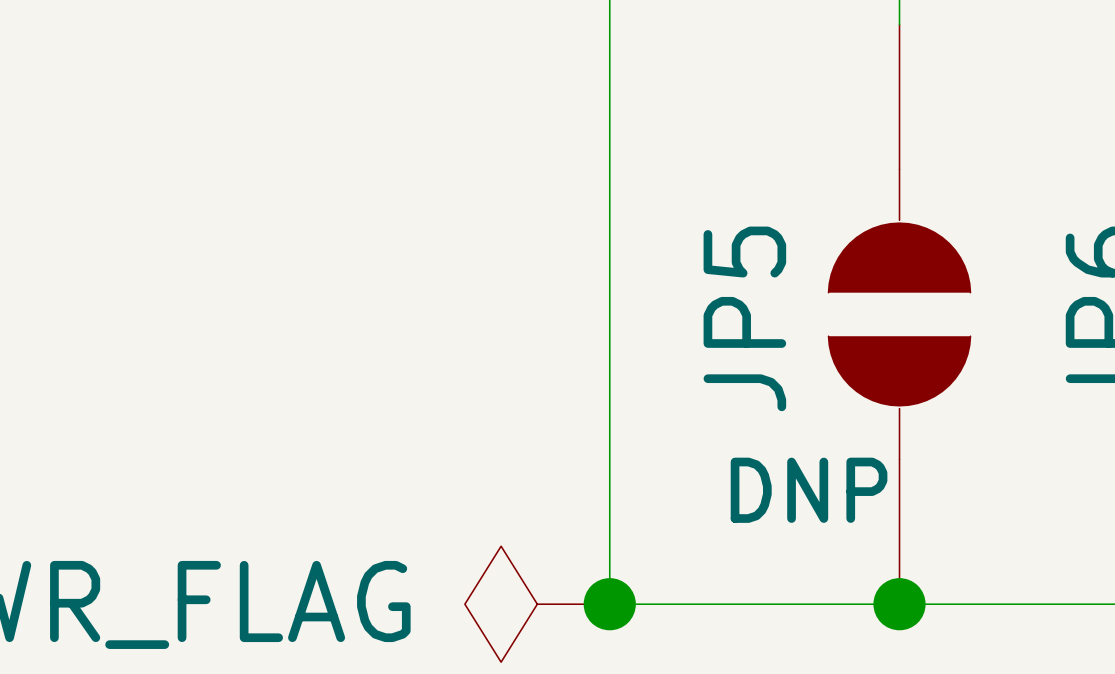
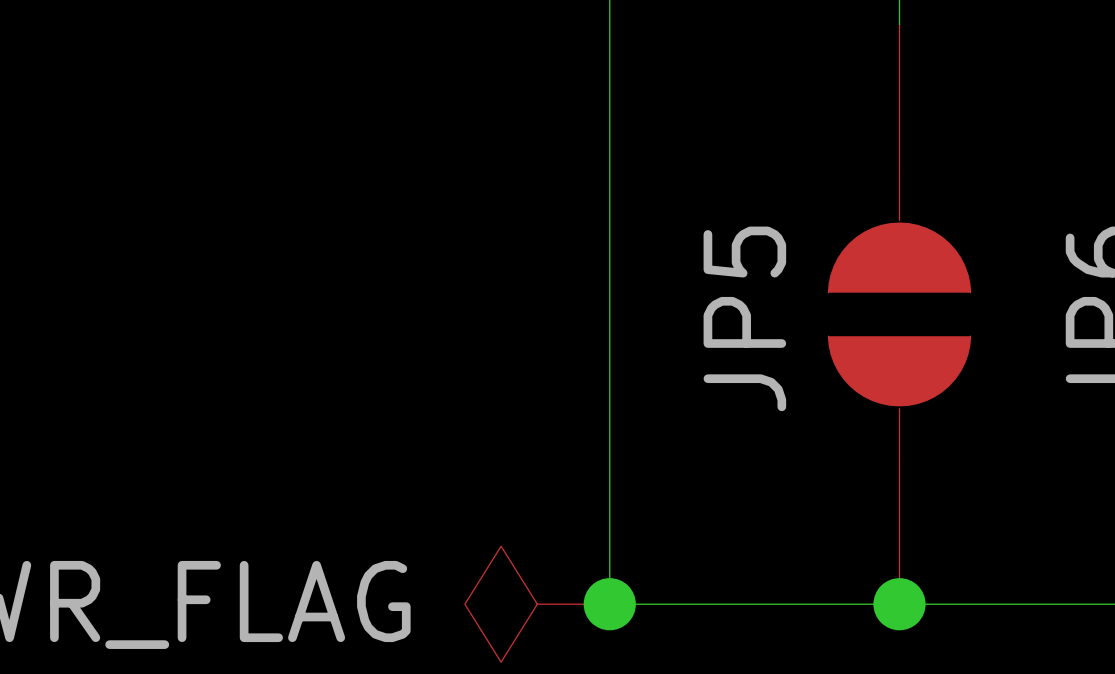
JP5 value: DNP (809, 490) -> none

